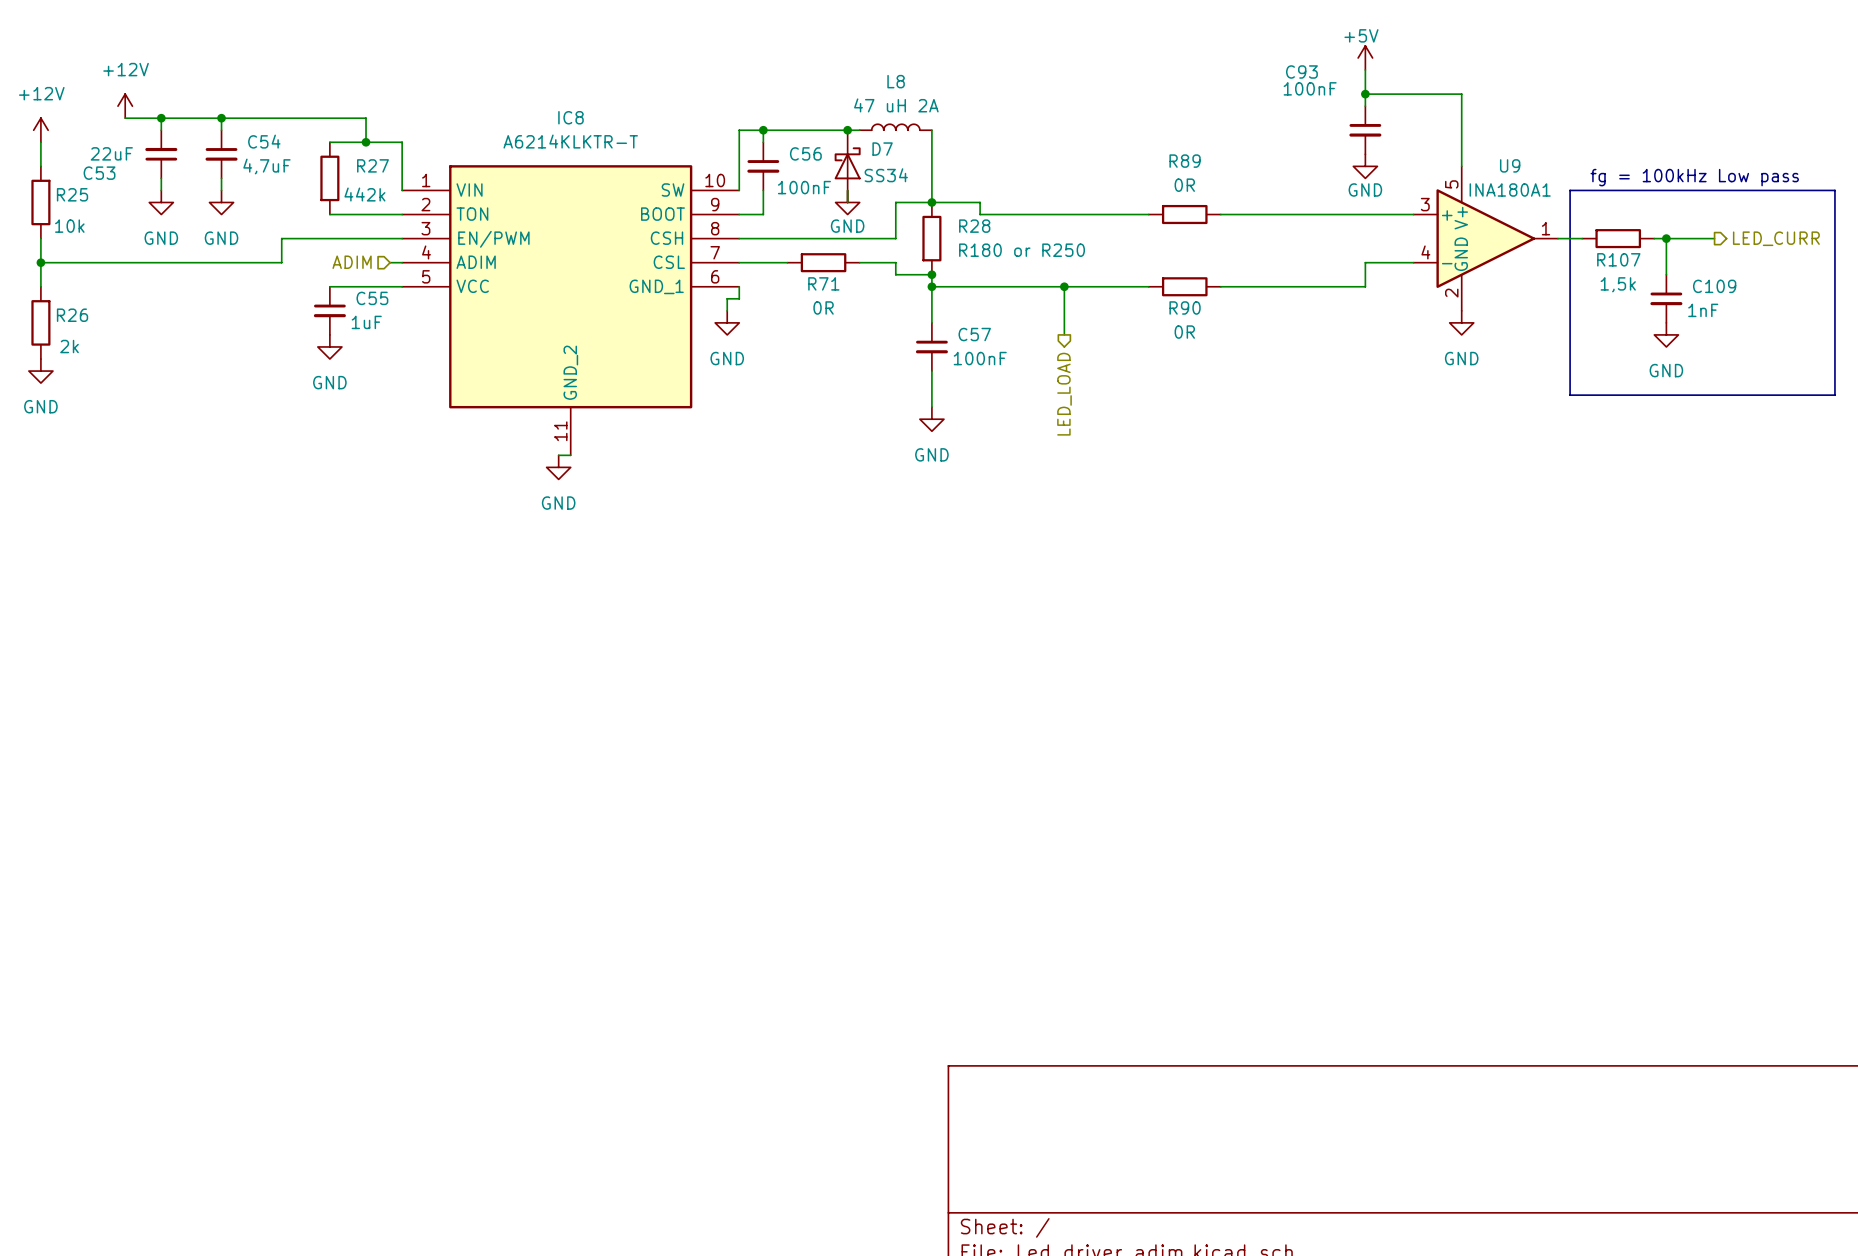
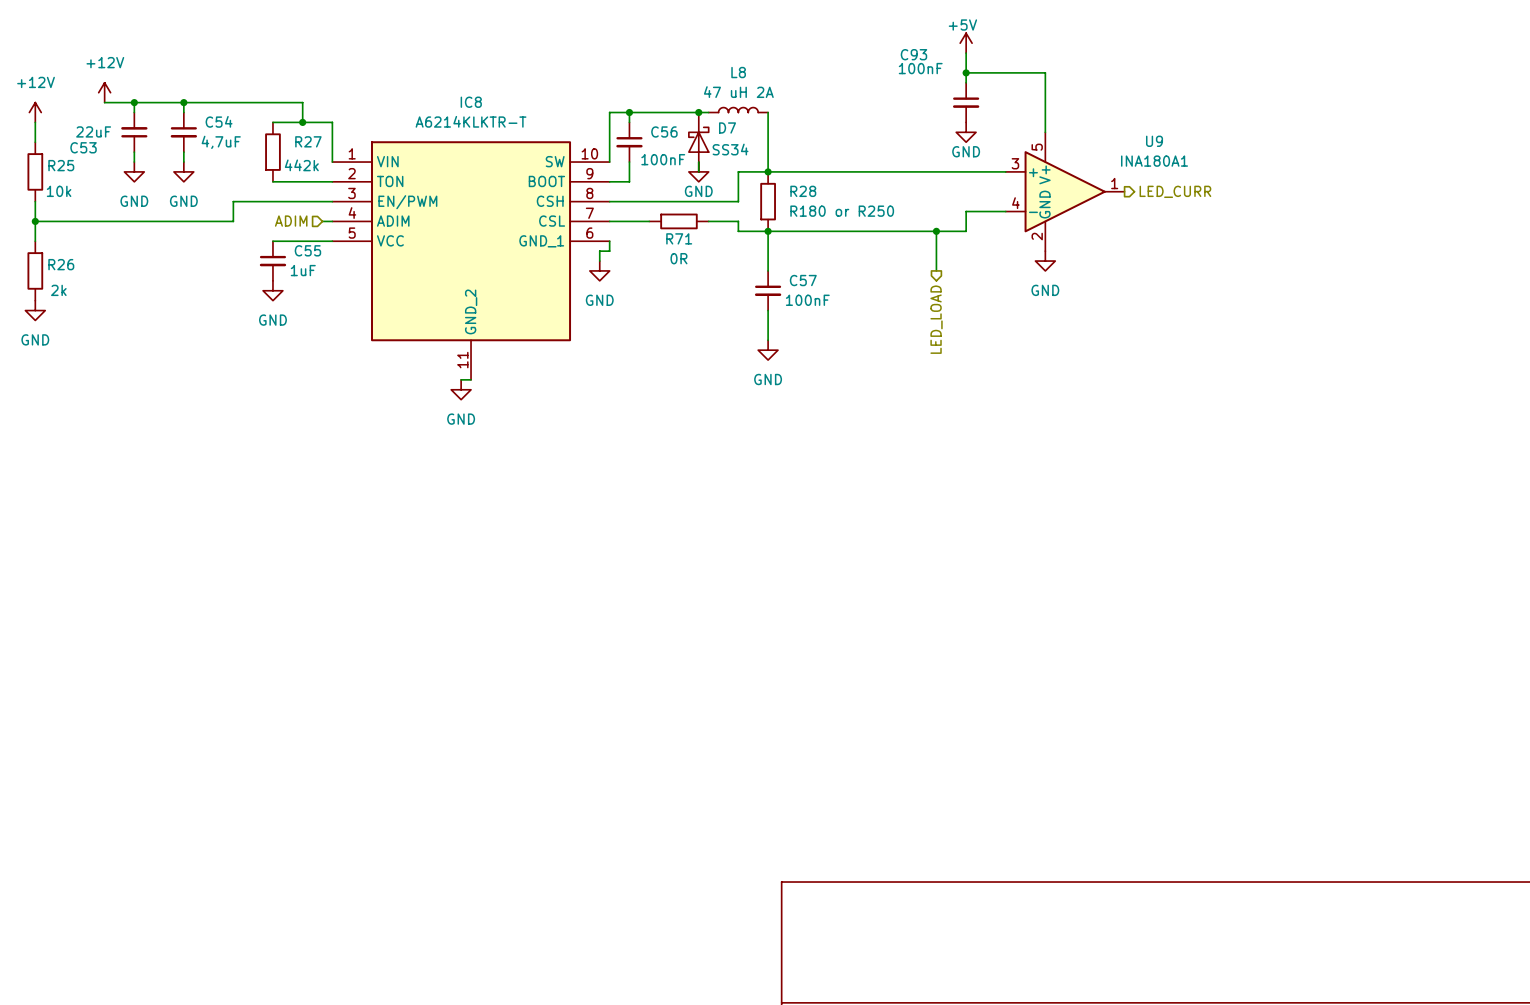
power symbol position: +5V (1365, 58) -> +5V (966, 43)
wire: (1365, 70) (1365, 106) -> (966, 53) (966, 82)
junction: none -> (966, 72)
wire: (1365, 94) (1461, 94) (1461, 166) -> (966, 72) (1045, 72) (1045, 132)
junction: (1365, 94) -> none
C93 position: (1365, 130) -> (966, 102)
power symbol: none -> GND (966, 132)
U9 name position: U9 (1510, 165) -> U9 (1154, 141)
power symbol: GND (1365, 166) -> none
text: fg = 100kHz Low pass (1694, 177) -> none
U9 value position: INA180A1 (1510, 189) -> INA180A1 (1154, 161)
line: (1570, 190) (1834, 190) (1834, 395) (1570, 395) (1570, 190) -> none
wire: (980, 202) (980, 214) (1148, 214) -> (807, 171) (1005, 171)
R89: 0R (1184, 214) -> none
wire: (1220, 214) (1413, 214) -> none
hierarchical label: none -> LED_CURR (1175, 191)
U9 position: (1485, 238) -> (1065, 191)
wire: (1558, 238) (1582, 238) -> none
R107: 1,5k (1618, 238) -> none
wire: (1654, 238) (1714, 238) -> none
wire: (1666, 238) (1666, 274) -> none
junction: (1666, 238) -> none
hierarchical label: LED_CURR (1776, 238) -> none
wire: none -> (1005, 211) (966, 211) (966, 231) (768, 231)
wire: (1413, 262) (1365, 262) (1365, 286) (1220, 286) -> none
junction: none -> (936, 231)
wire: (931, 286) (1148, 286) -> none
junction: (931, 286) -> none
wire: (1064, 286) (1064, 334) -> (936, 231) (936, 270)
junction: (1064, 286) -> none
R90: 0R (1184, 286) -> none
C109: 1nF (1666, 298) -> none
power symbol: none -> GND (1045, 261)
power symbol: GND (1461, 322) -> none
power symbol: GND (1666, 334) -> none
hierarchical label position: LED_LOAD (1064, 394) -> LED_LOAD (936, 319)

